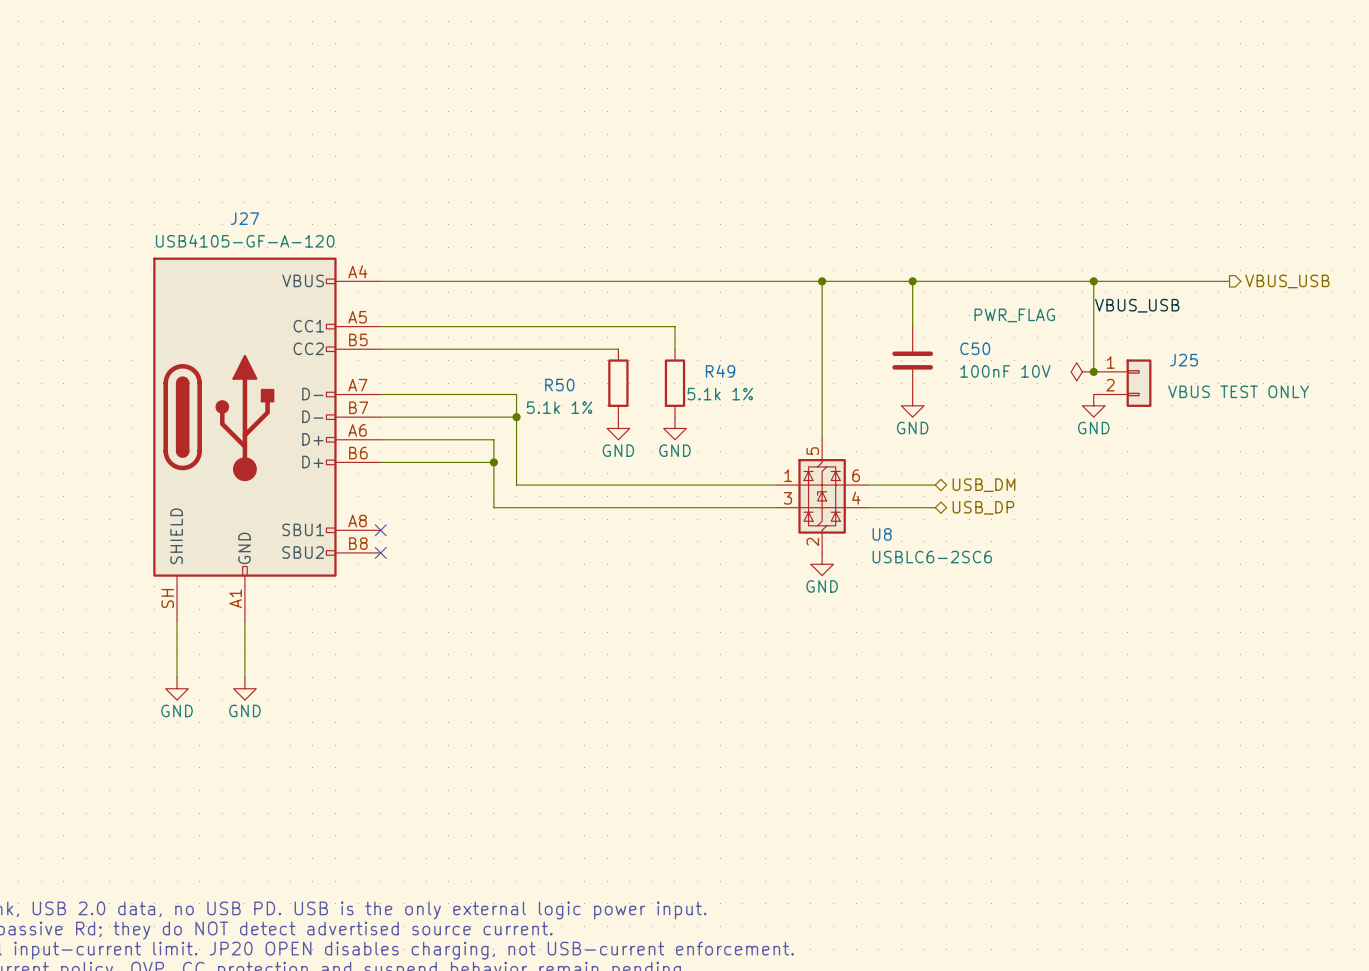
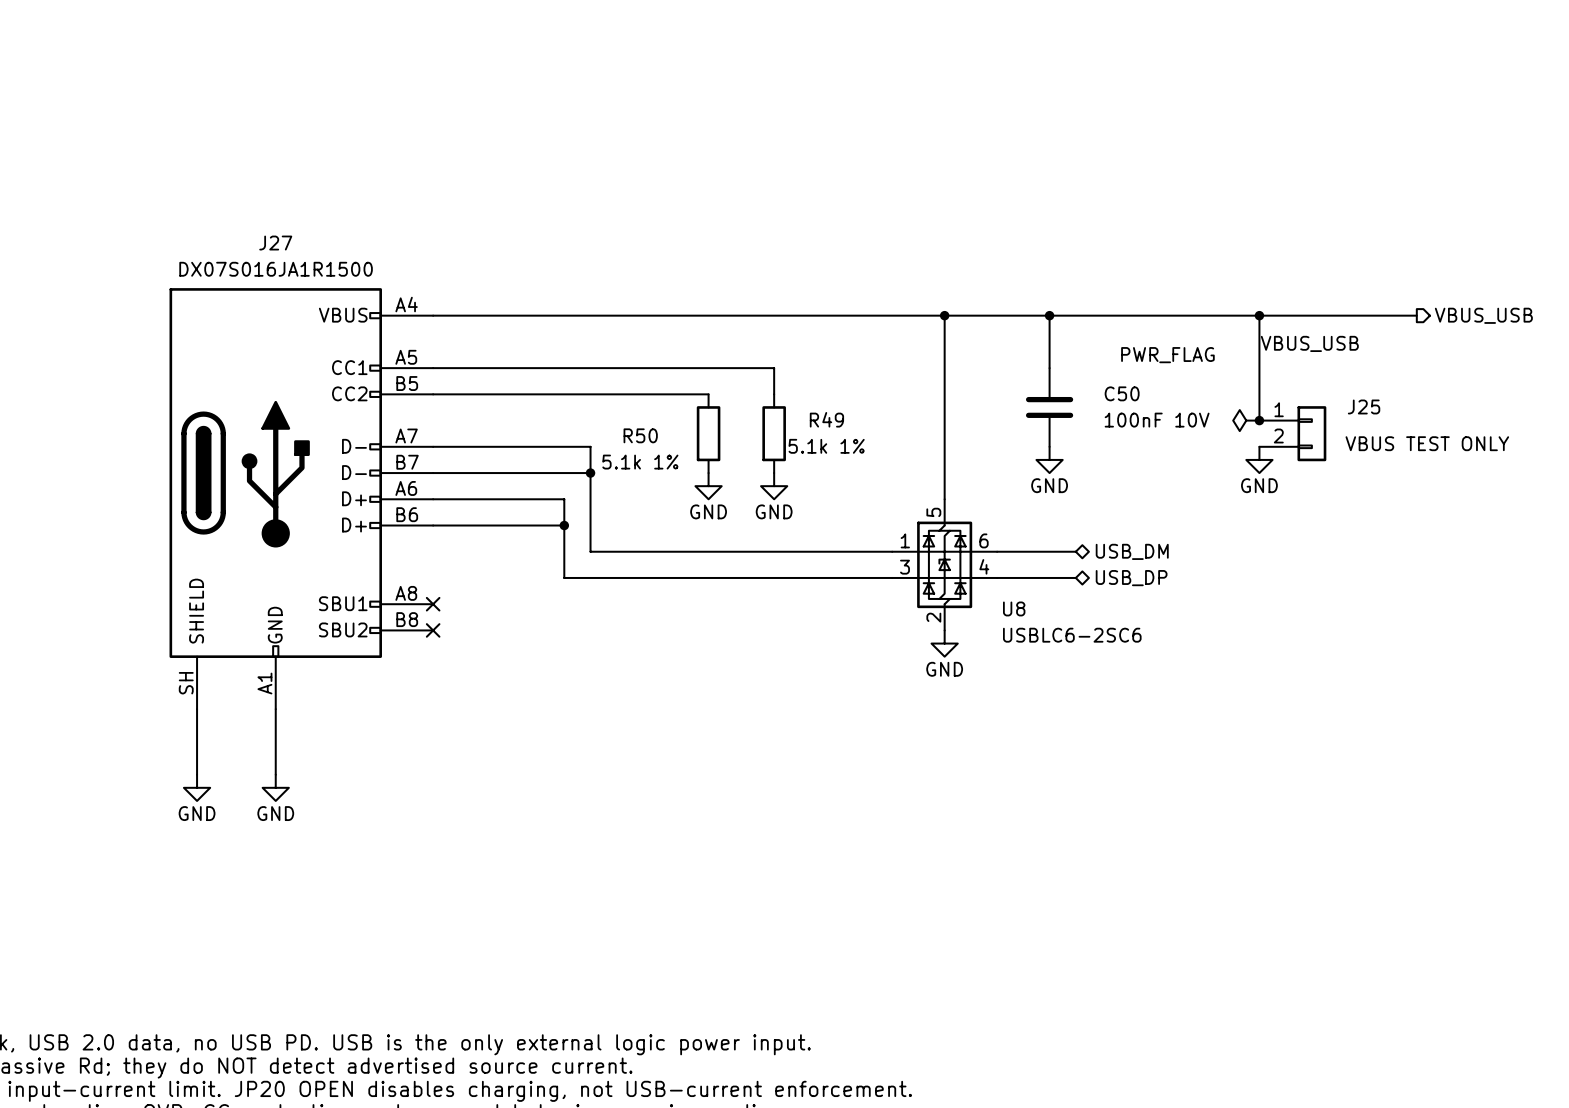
J27 value: USB4105-GF-A-120 (245, 241) -> DX07S016JA1R1500 (276, 269)

